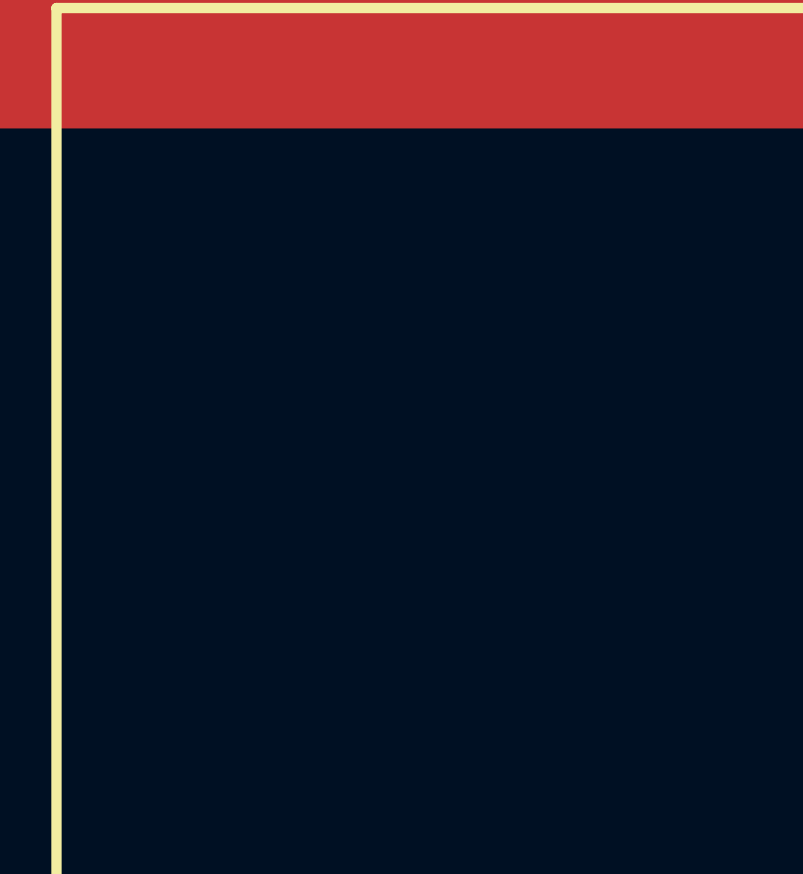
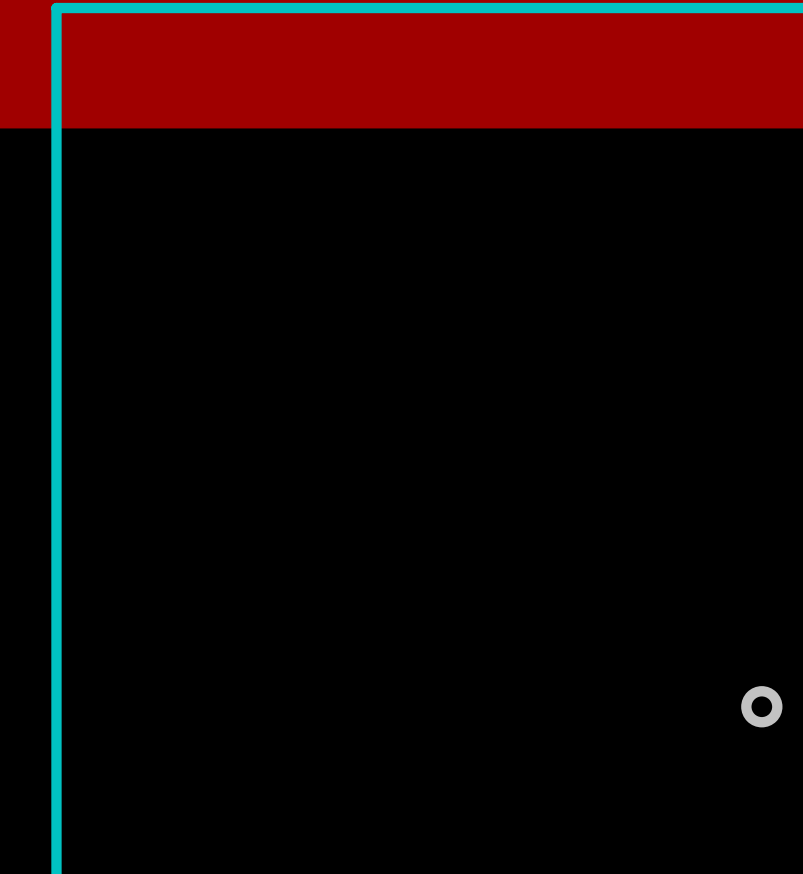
via: none -> (761, 706)

